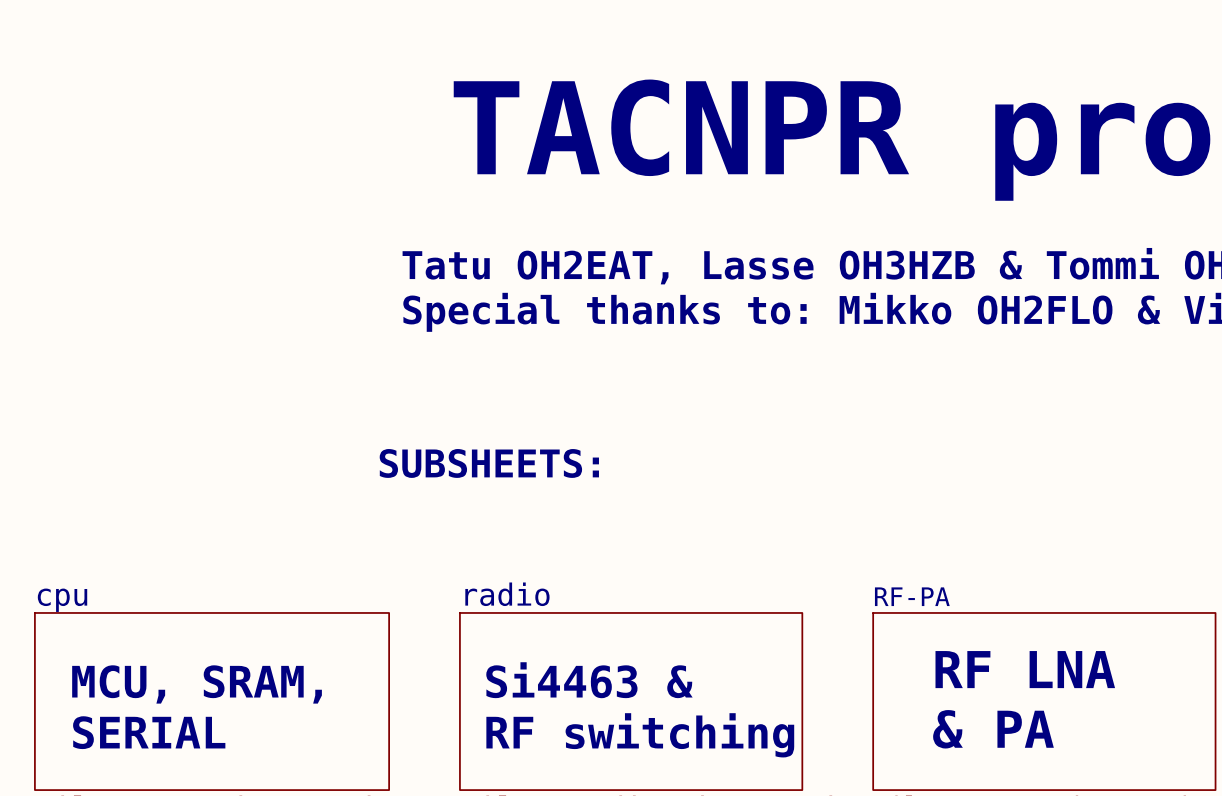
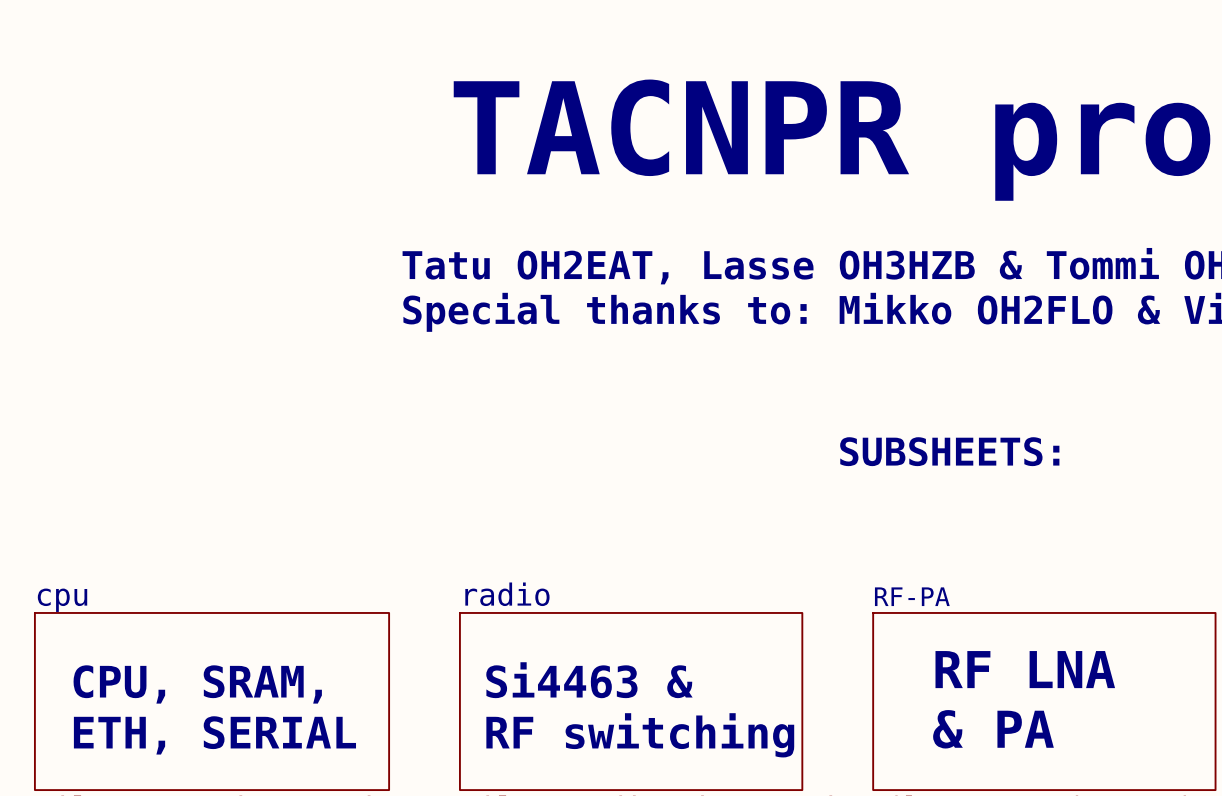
text: none -> SUBSHEETS: (949, 451)
text: SUBSHEETS: (489, 463) -> none
text: MCU, SRAM, (197, 684) -> CPU, SRAM, (197, 684)
text: SERIAL (149, 732) -> ETH, SERIAL (214, 735)

